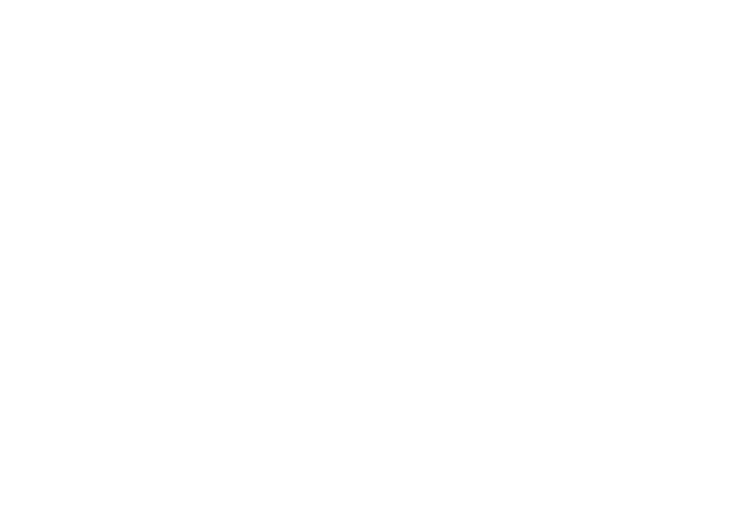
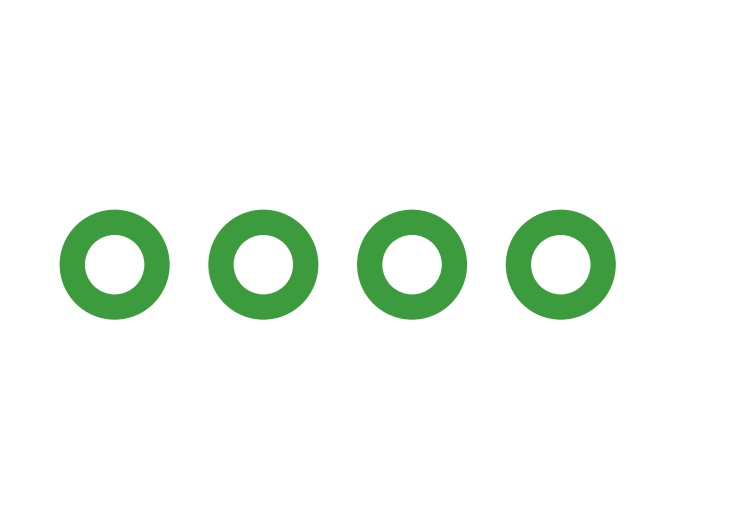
part: none -> (337, 264)

